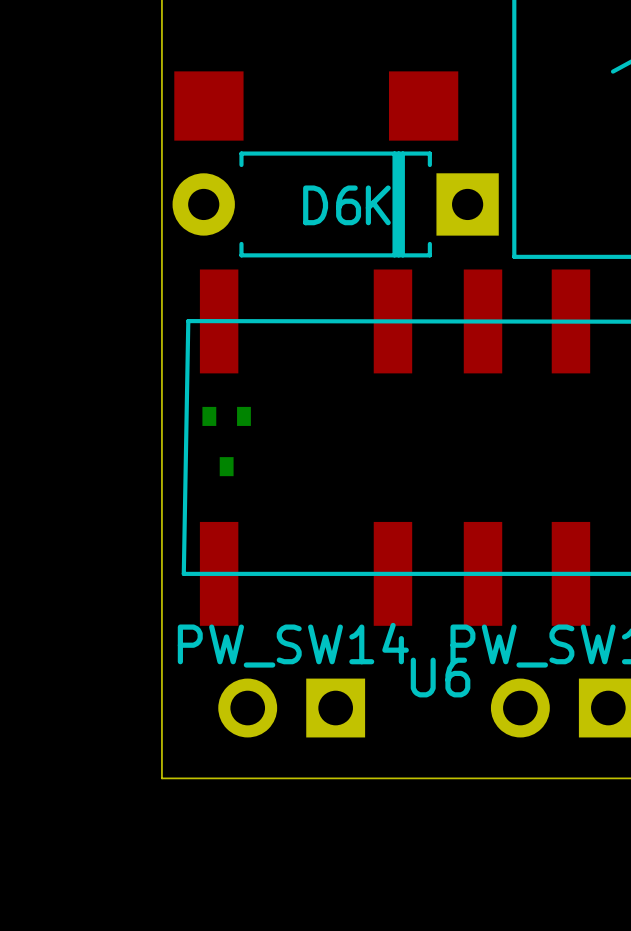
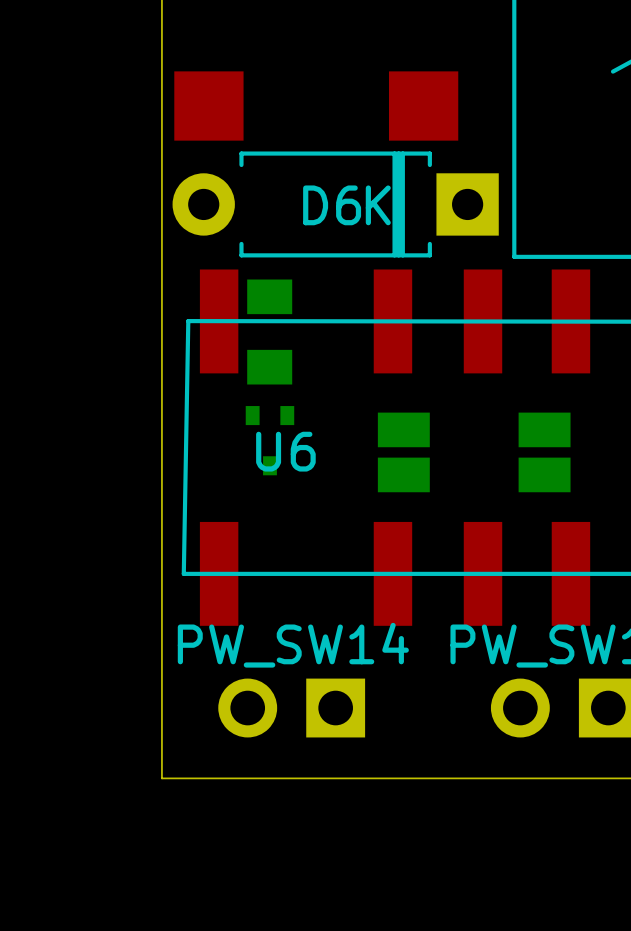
part: none -> (269, 332)
part position: (226, 441) -> (269, 440)
part: none -> (403, 452)
part: none -> (544, 452)
U6 name position: U6 (440, 677) -> U6 (285, 451)

